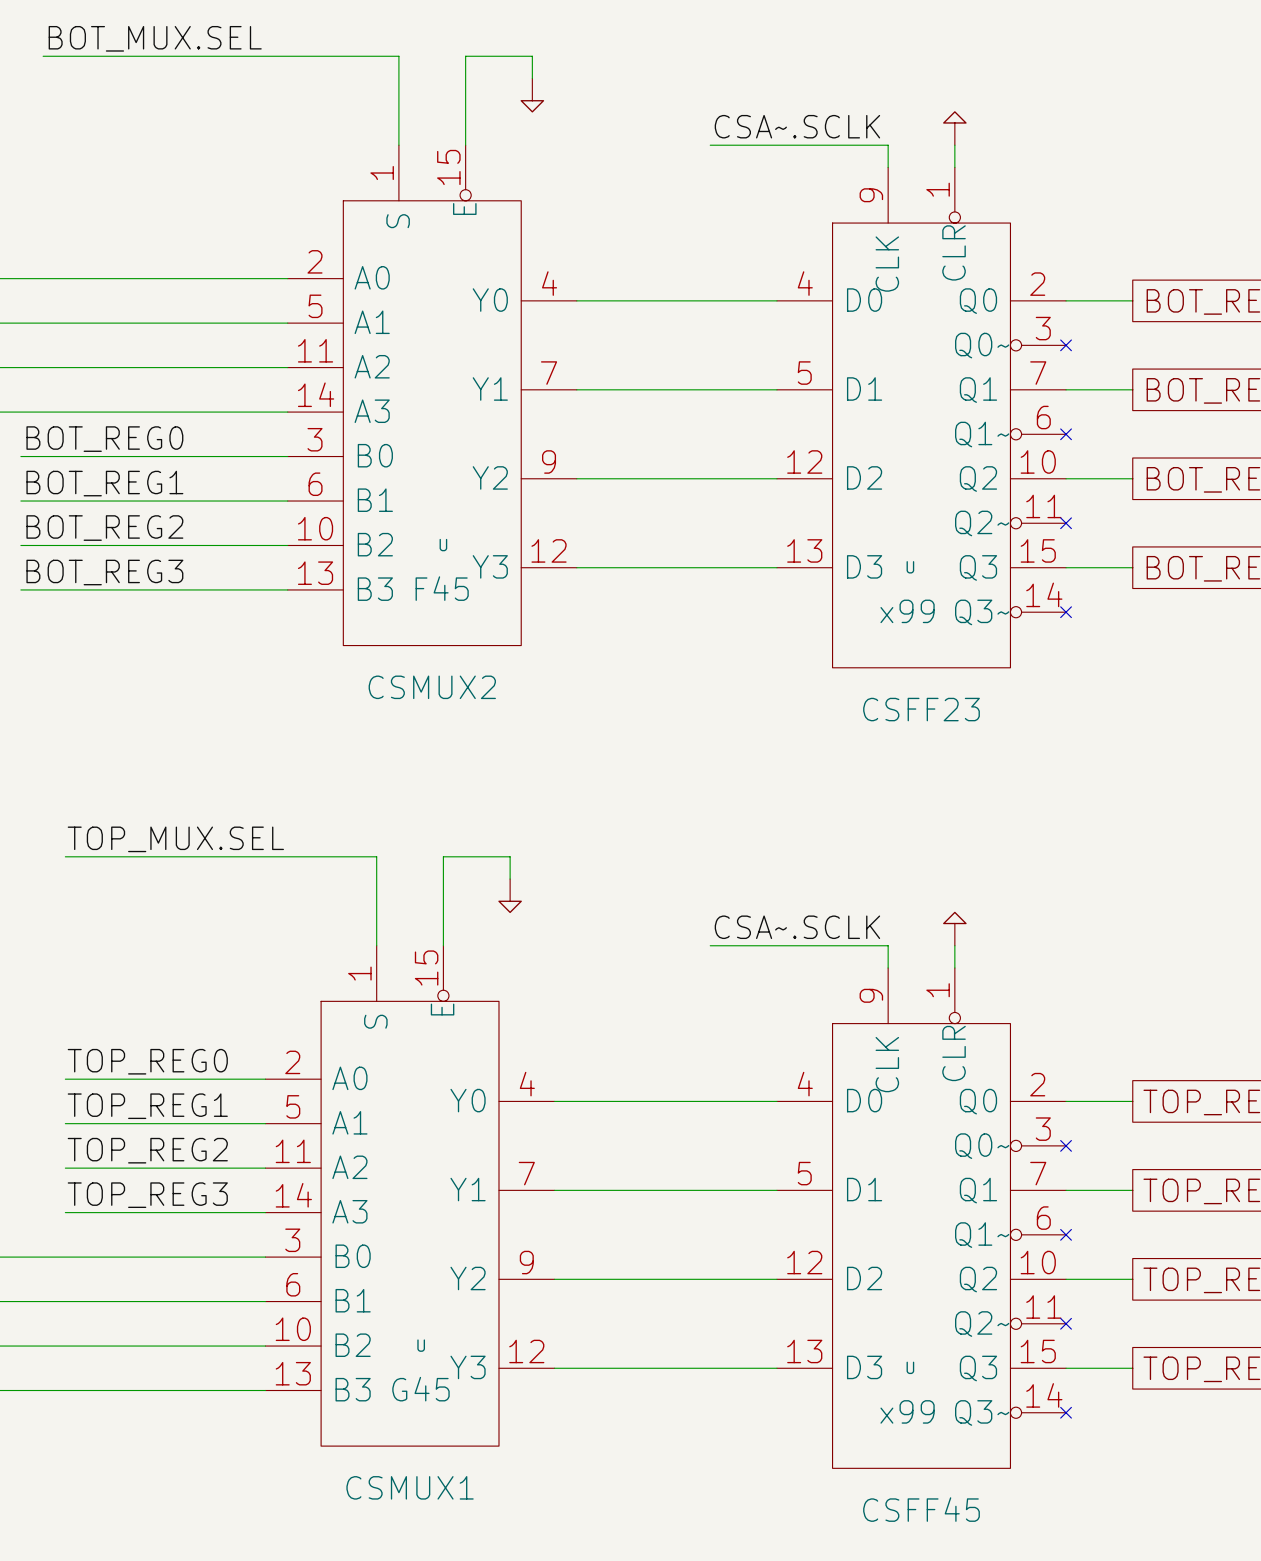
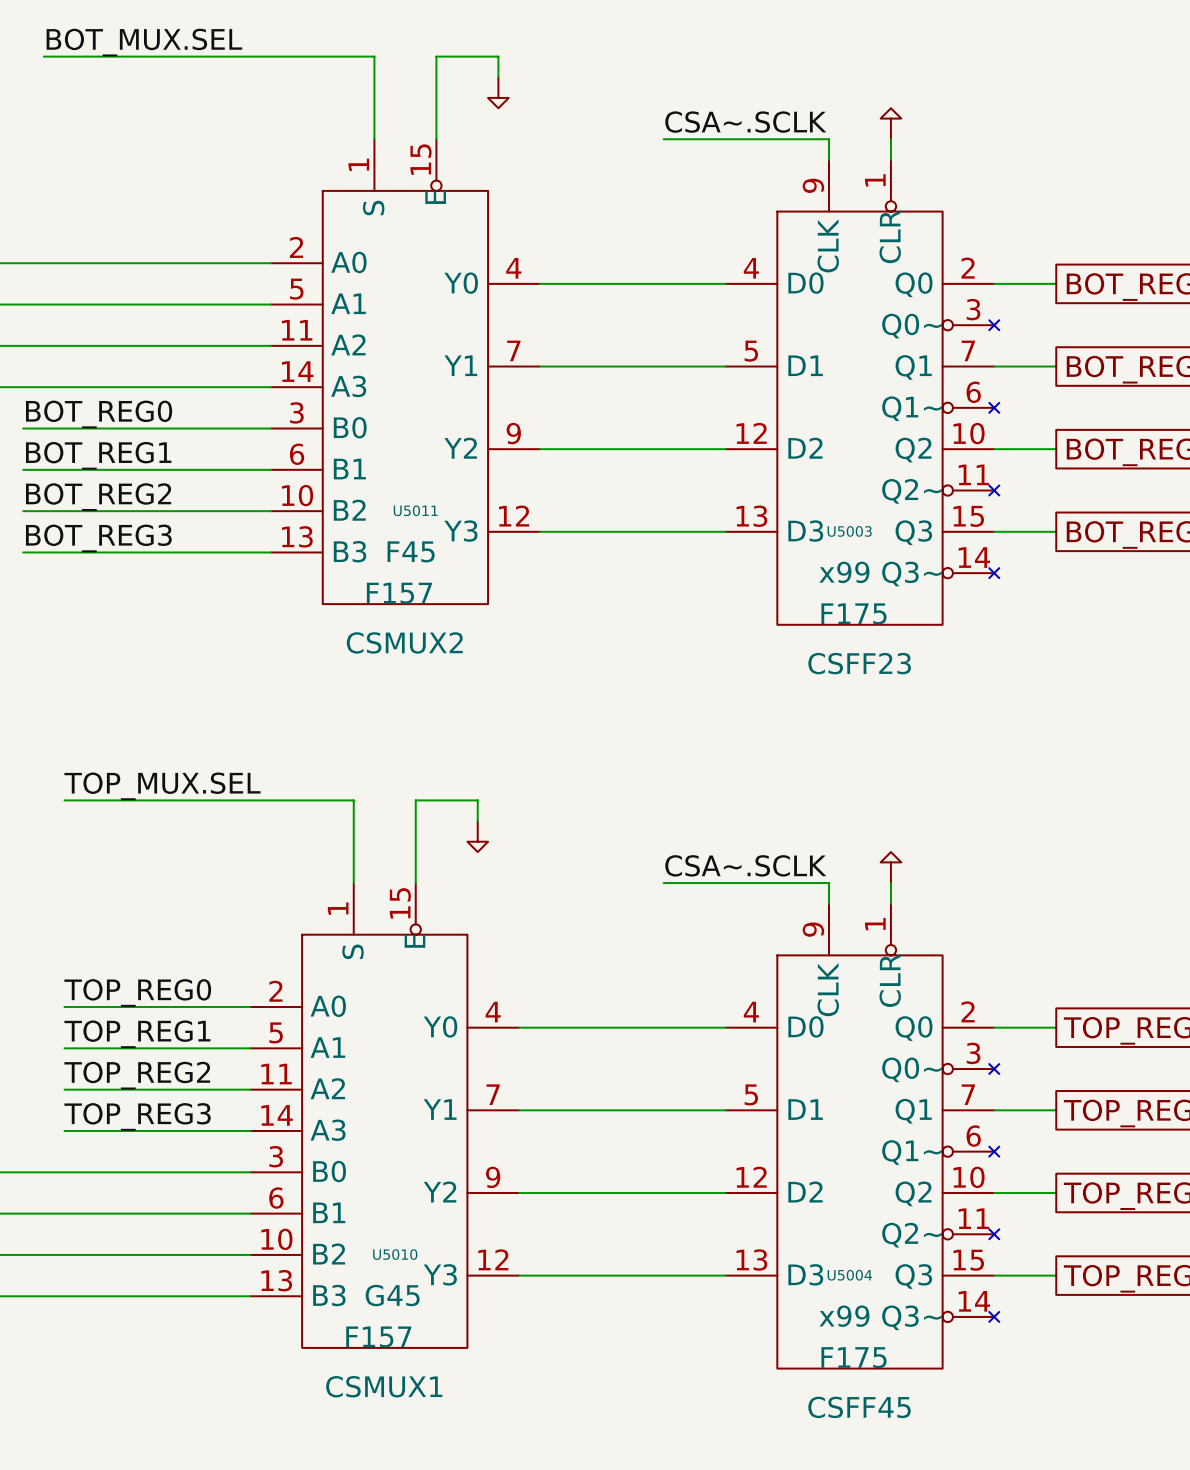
U name: U (443, 545) -> U5011 (415, 510)
U name: U (910, 567) -> U5003 (849, 531)
U value: none -> F157 (399, 593)
U value: none -> F175 (853, 613)
U name: U (421, 1345) -> U5010 (395, 1254)
U name: U (910, 1367) -> U5004 (849, 1275)
U value: none -> F157 (378, 1337)
U value: none -> F175 (853, 1357)

